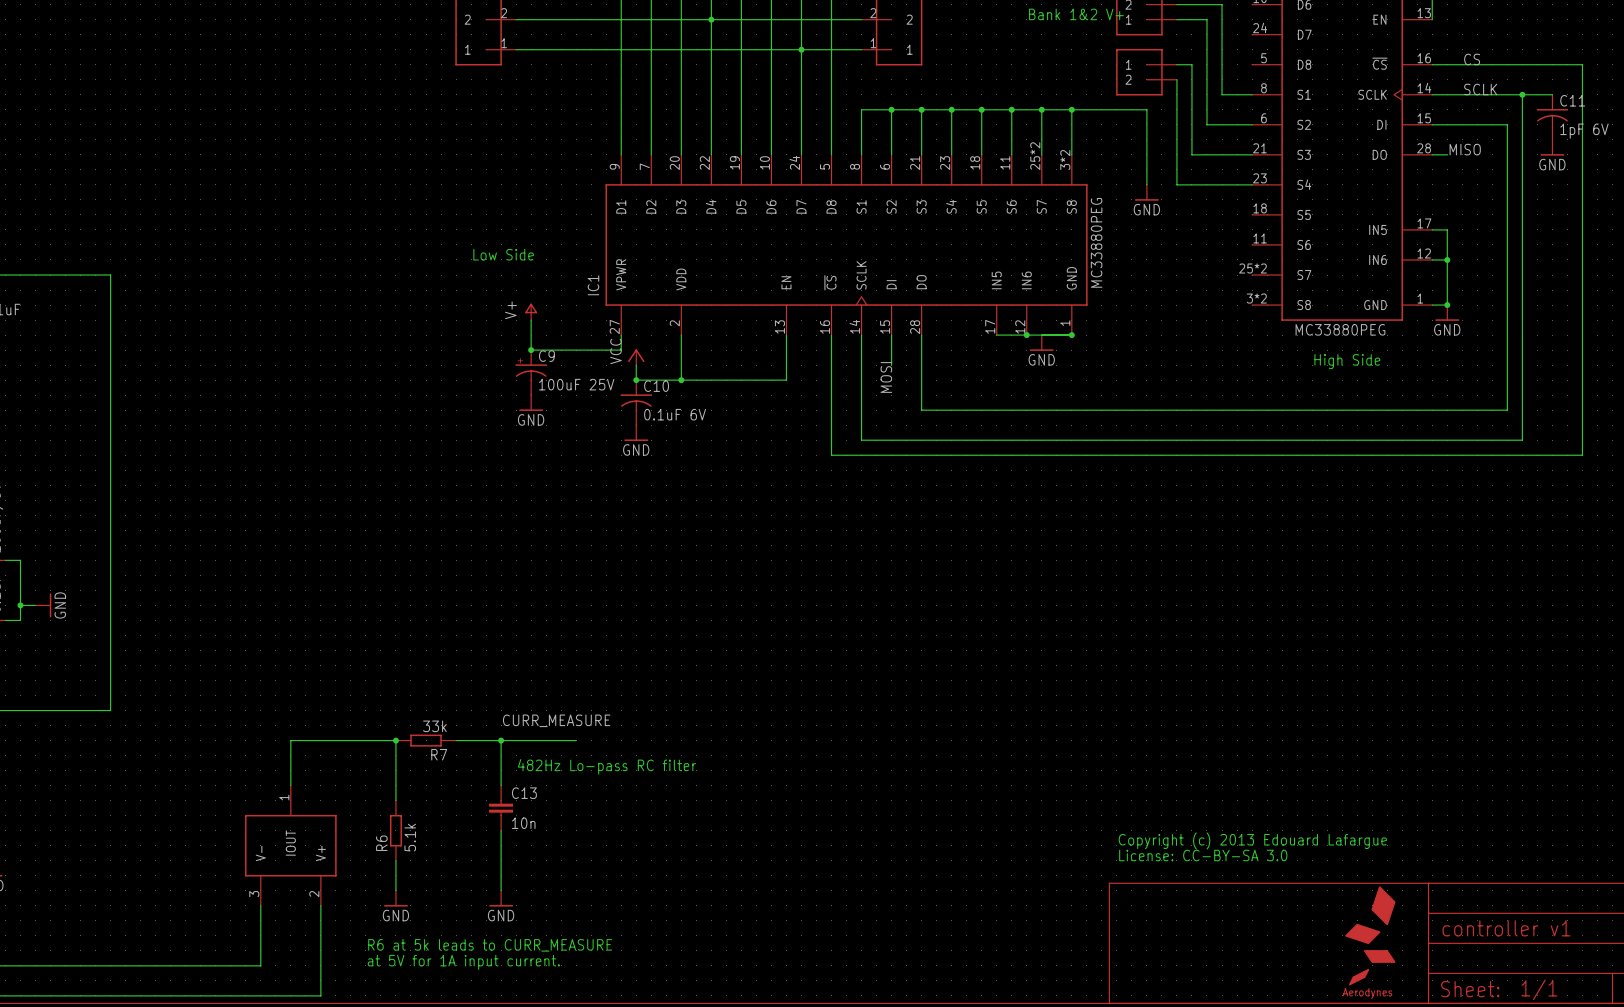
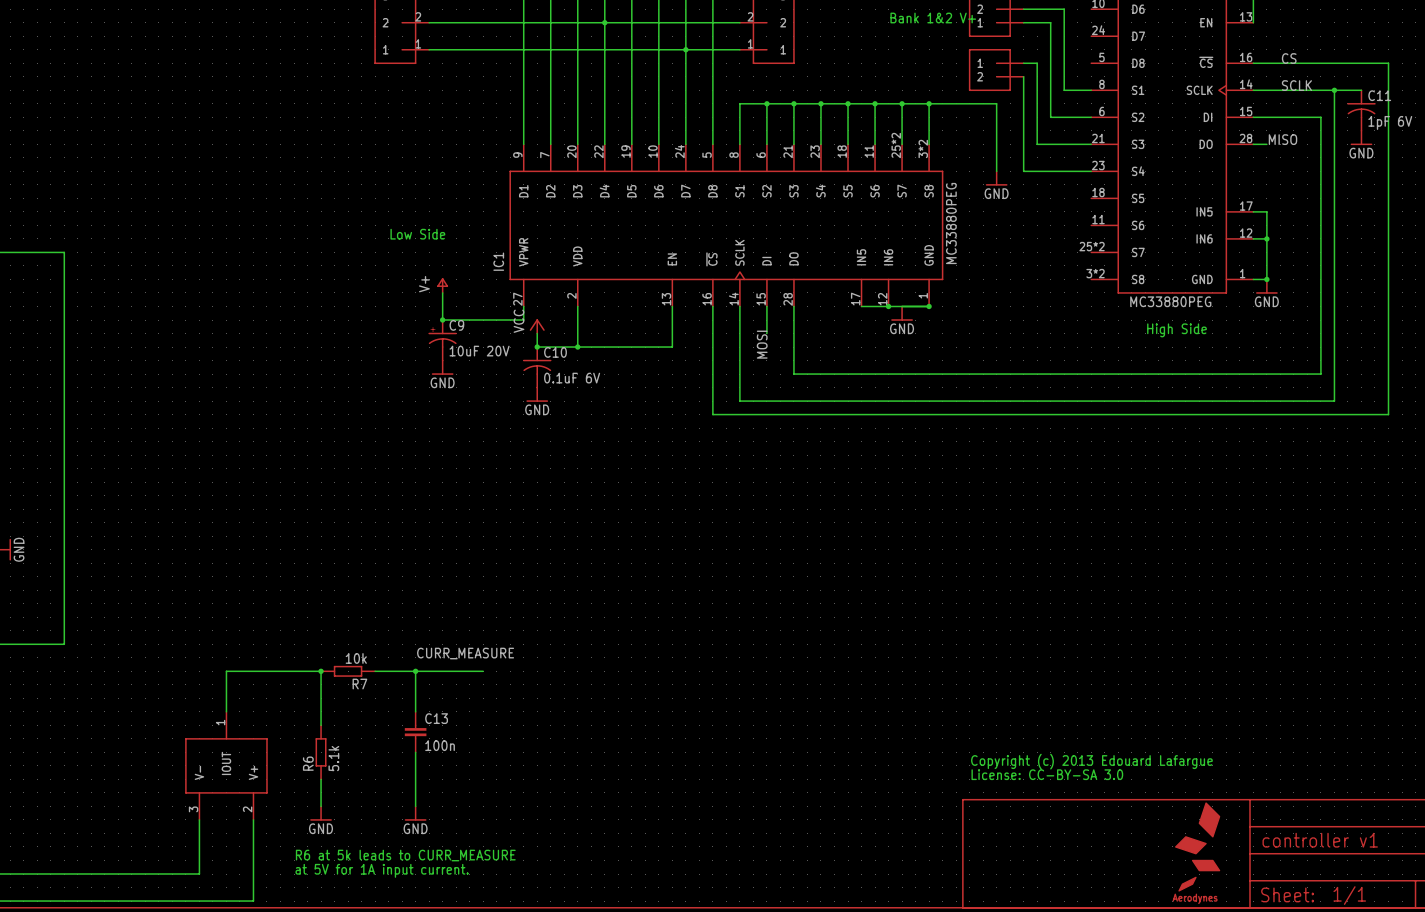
C9 value: 100uF 25V (576, 384) -> 10uF 20V (479, 351)
R7 value: 33k (434, 726) -> 10k (356, 658)
text: 482Hz Lo-pass RC filter (607, 766) -> none
C13 value: 10n (523, 823) -> 100n (440, 745)

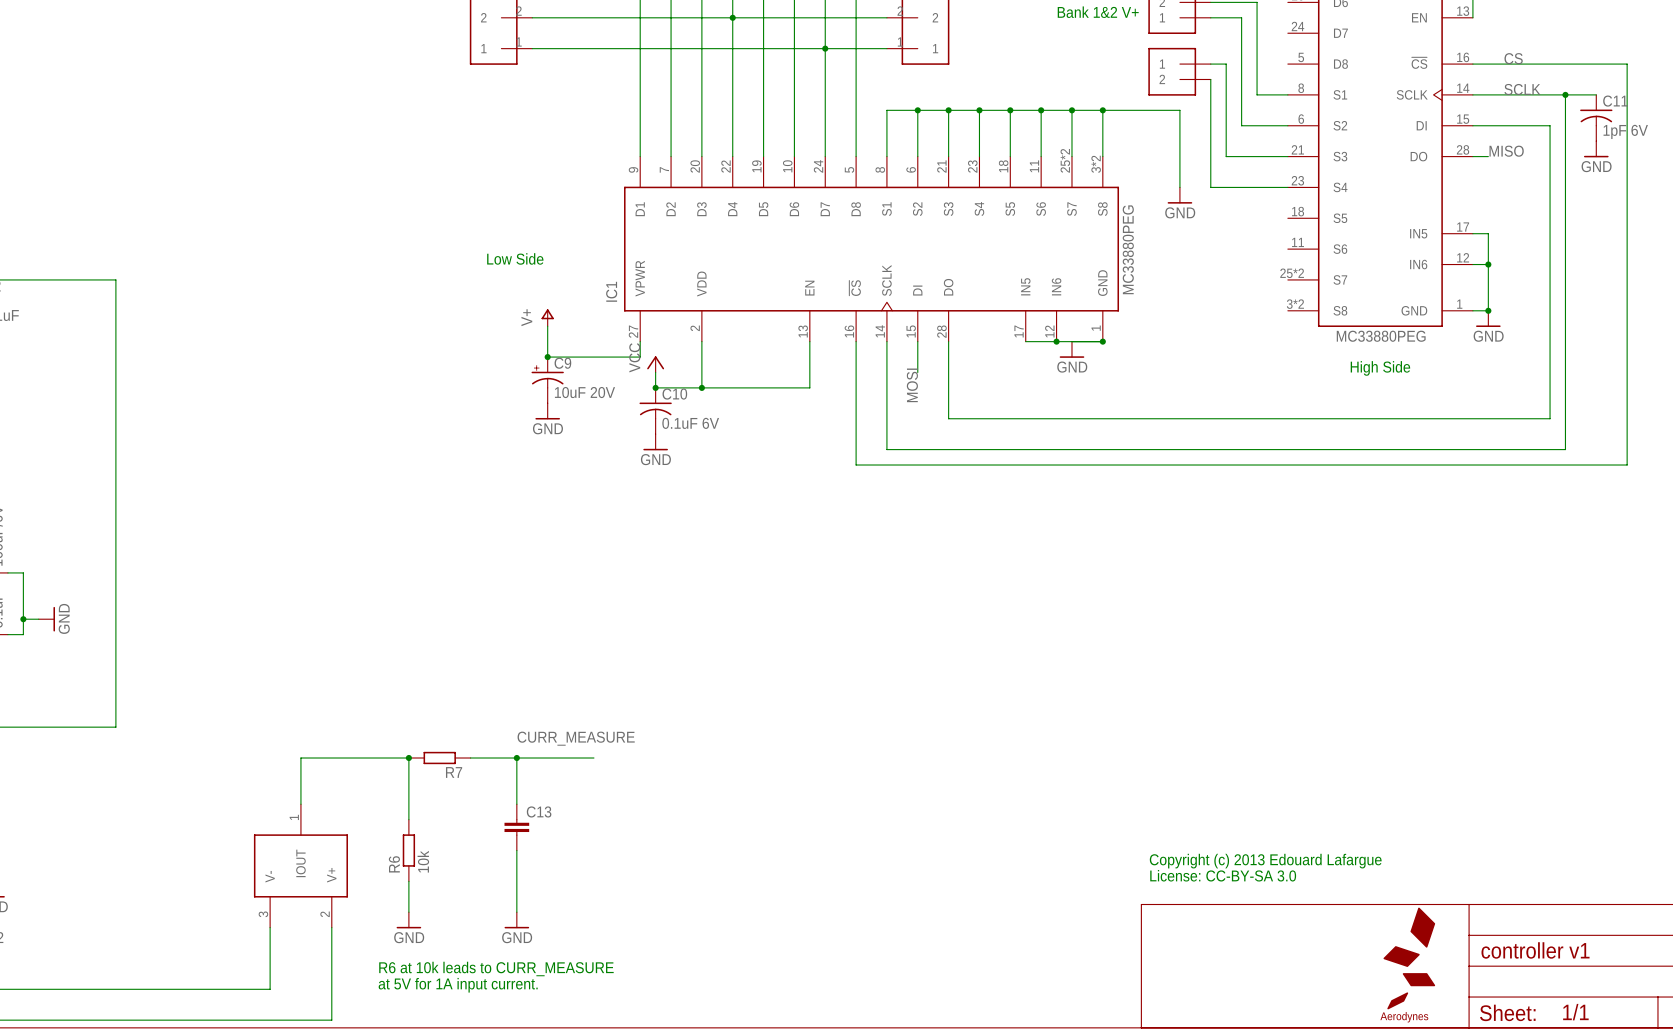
R7 value: 10k (356, 658) -> none
C13 value: 100n (440, 745) -> none
R6 value: 5.1k (333, 758) -> 10k (423, 861)
text: R6 at 5k leads to CURR_MEASURE (405, 855) -> R6 at 10k leads to CURR_MEASURE (496, 968)

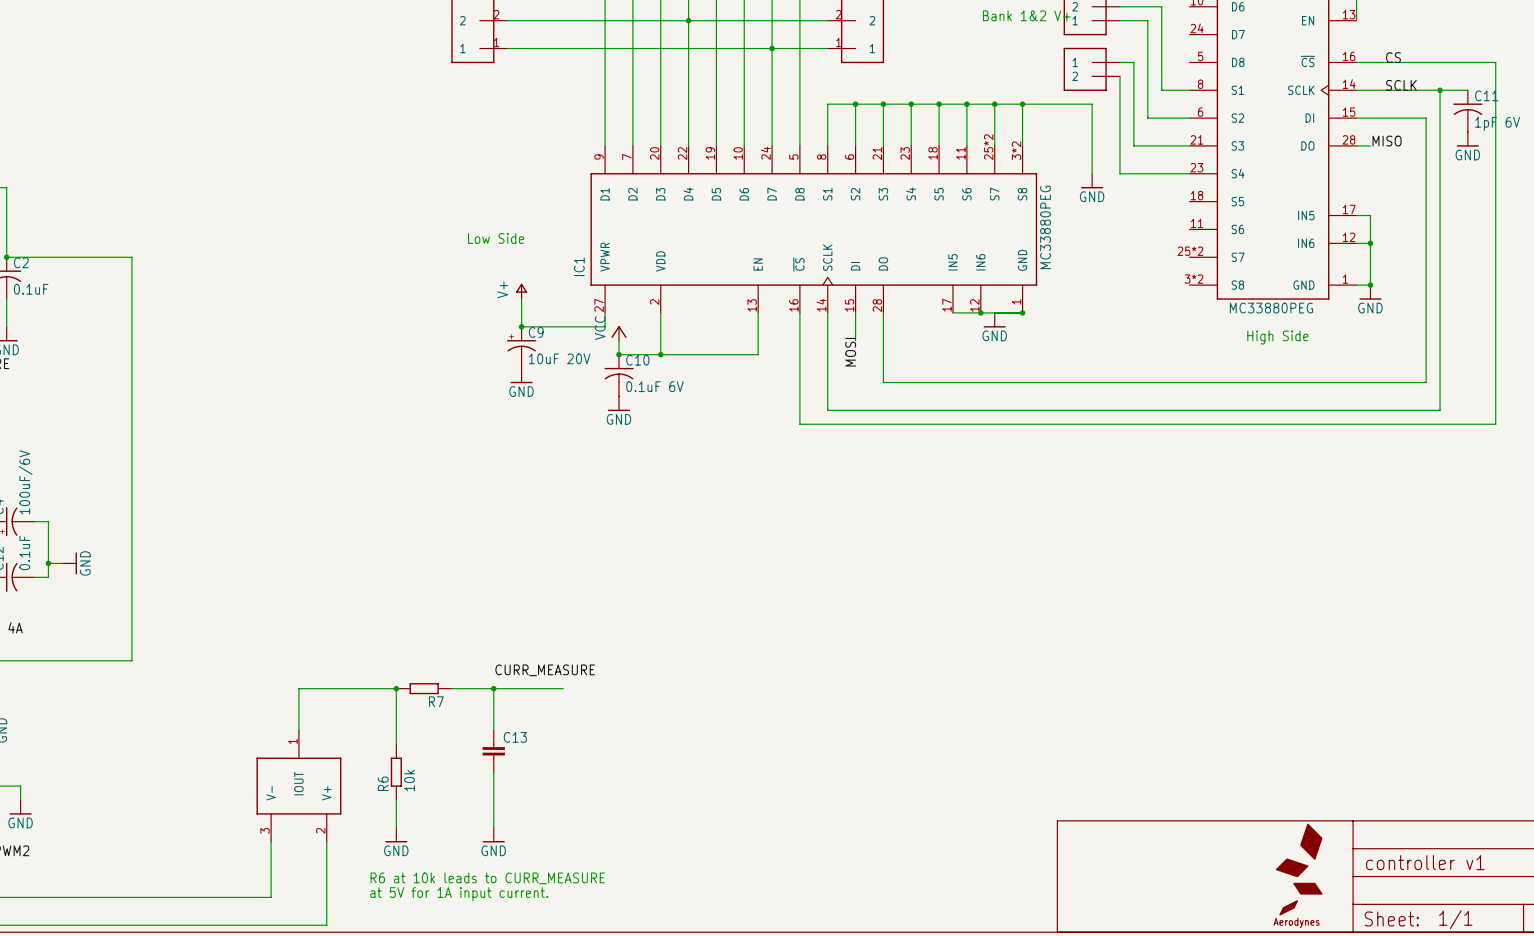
text: Copyright (c) 2013 Edouard Lafargue (1265, 861) -> none
text: License: CC-BY-SA 3.0 (1223, 875) -> none

